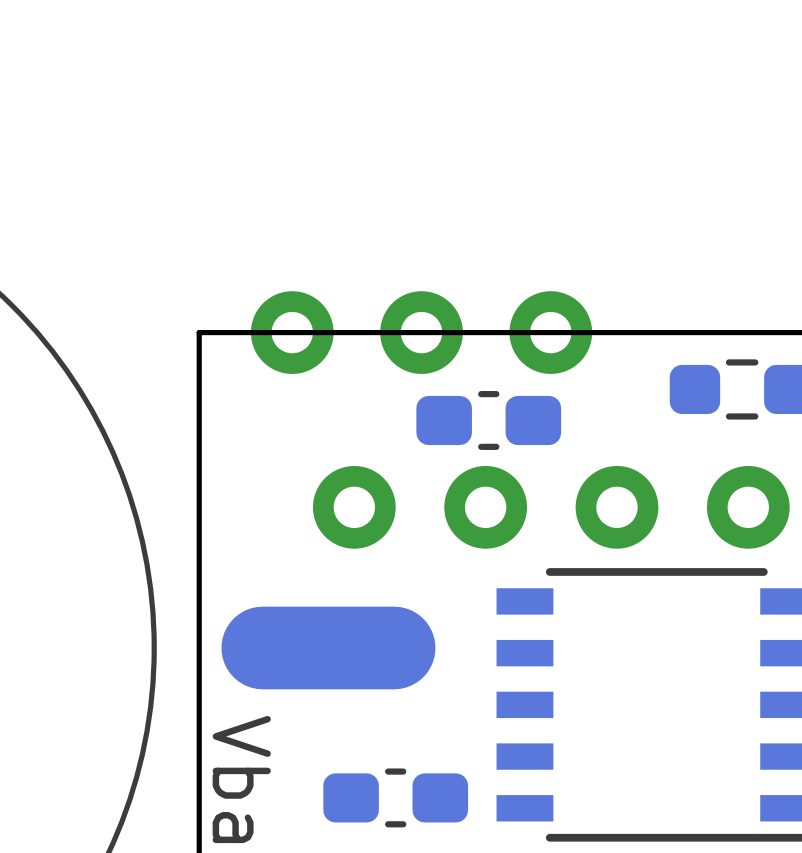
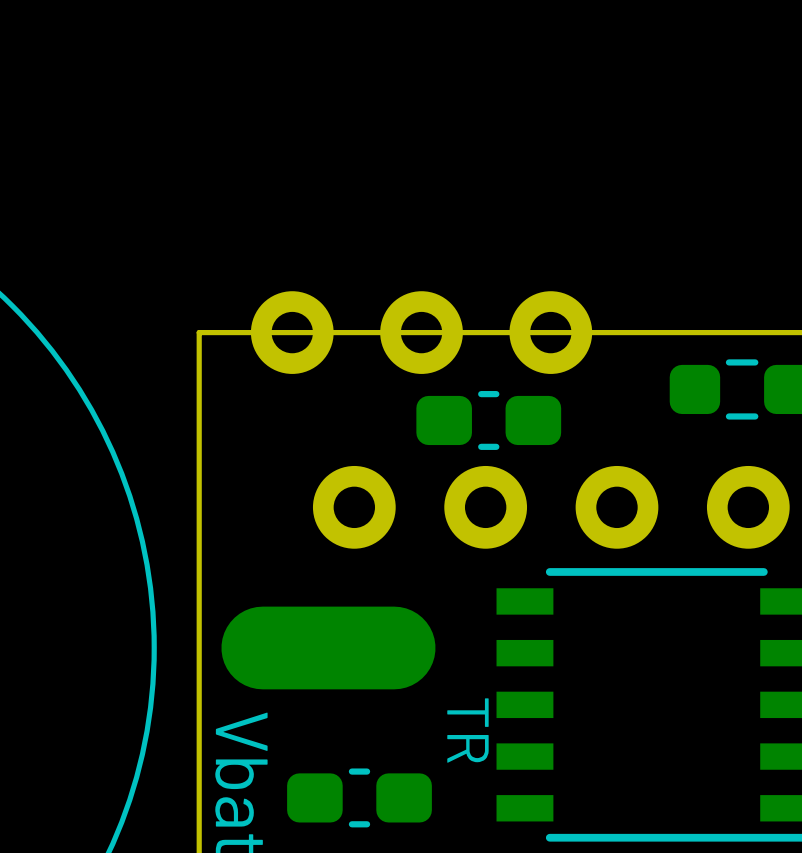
text: none -> TR (467, 730)
part position: (395, 797) -> (359, 797)

